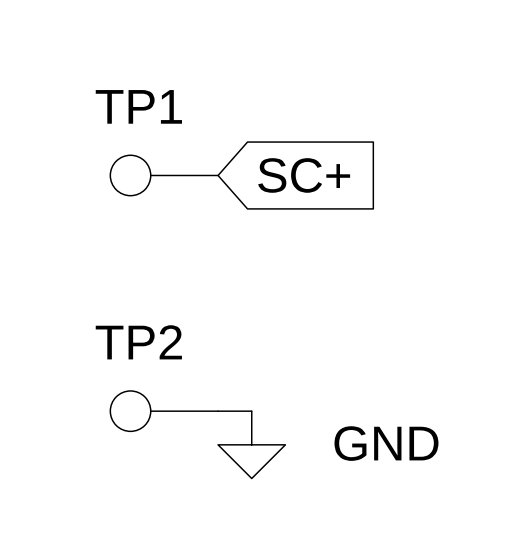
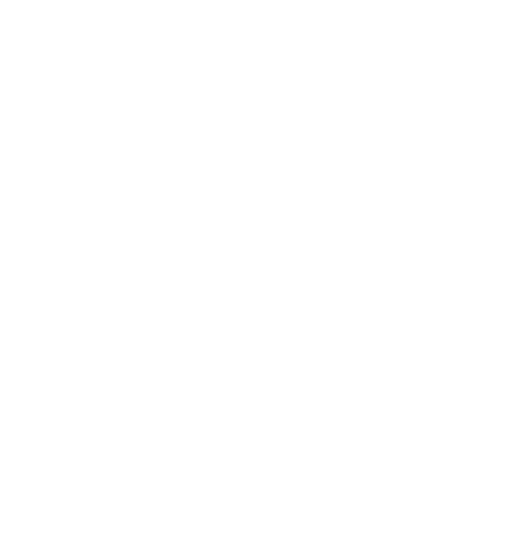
TP1: (164, 175) -> none
global label: SC+ (304, 175) -> none
TP2: (164, 411) -> none
wire: (218, 411) (251, 411) -> none
power symbol: GND (251, 444) -> none

